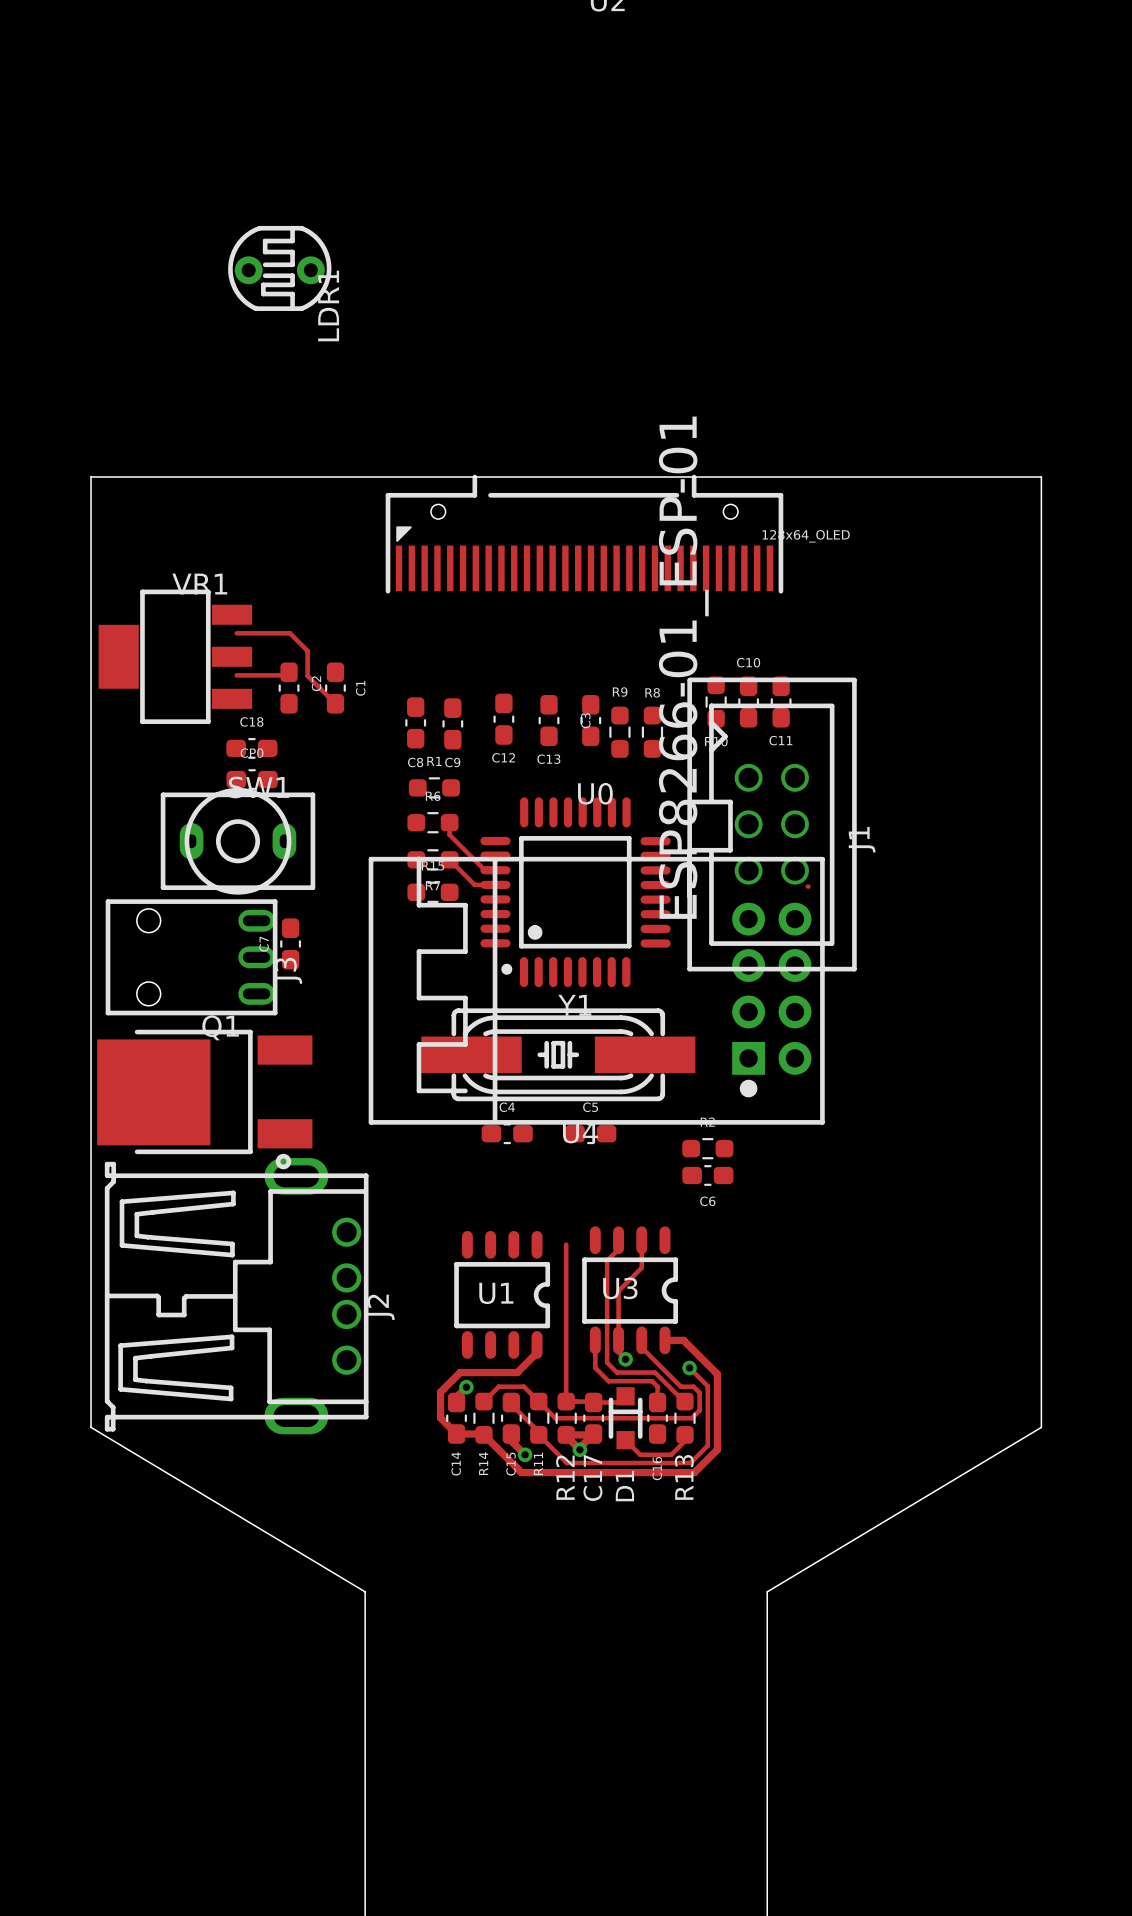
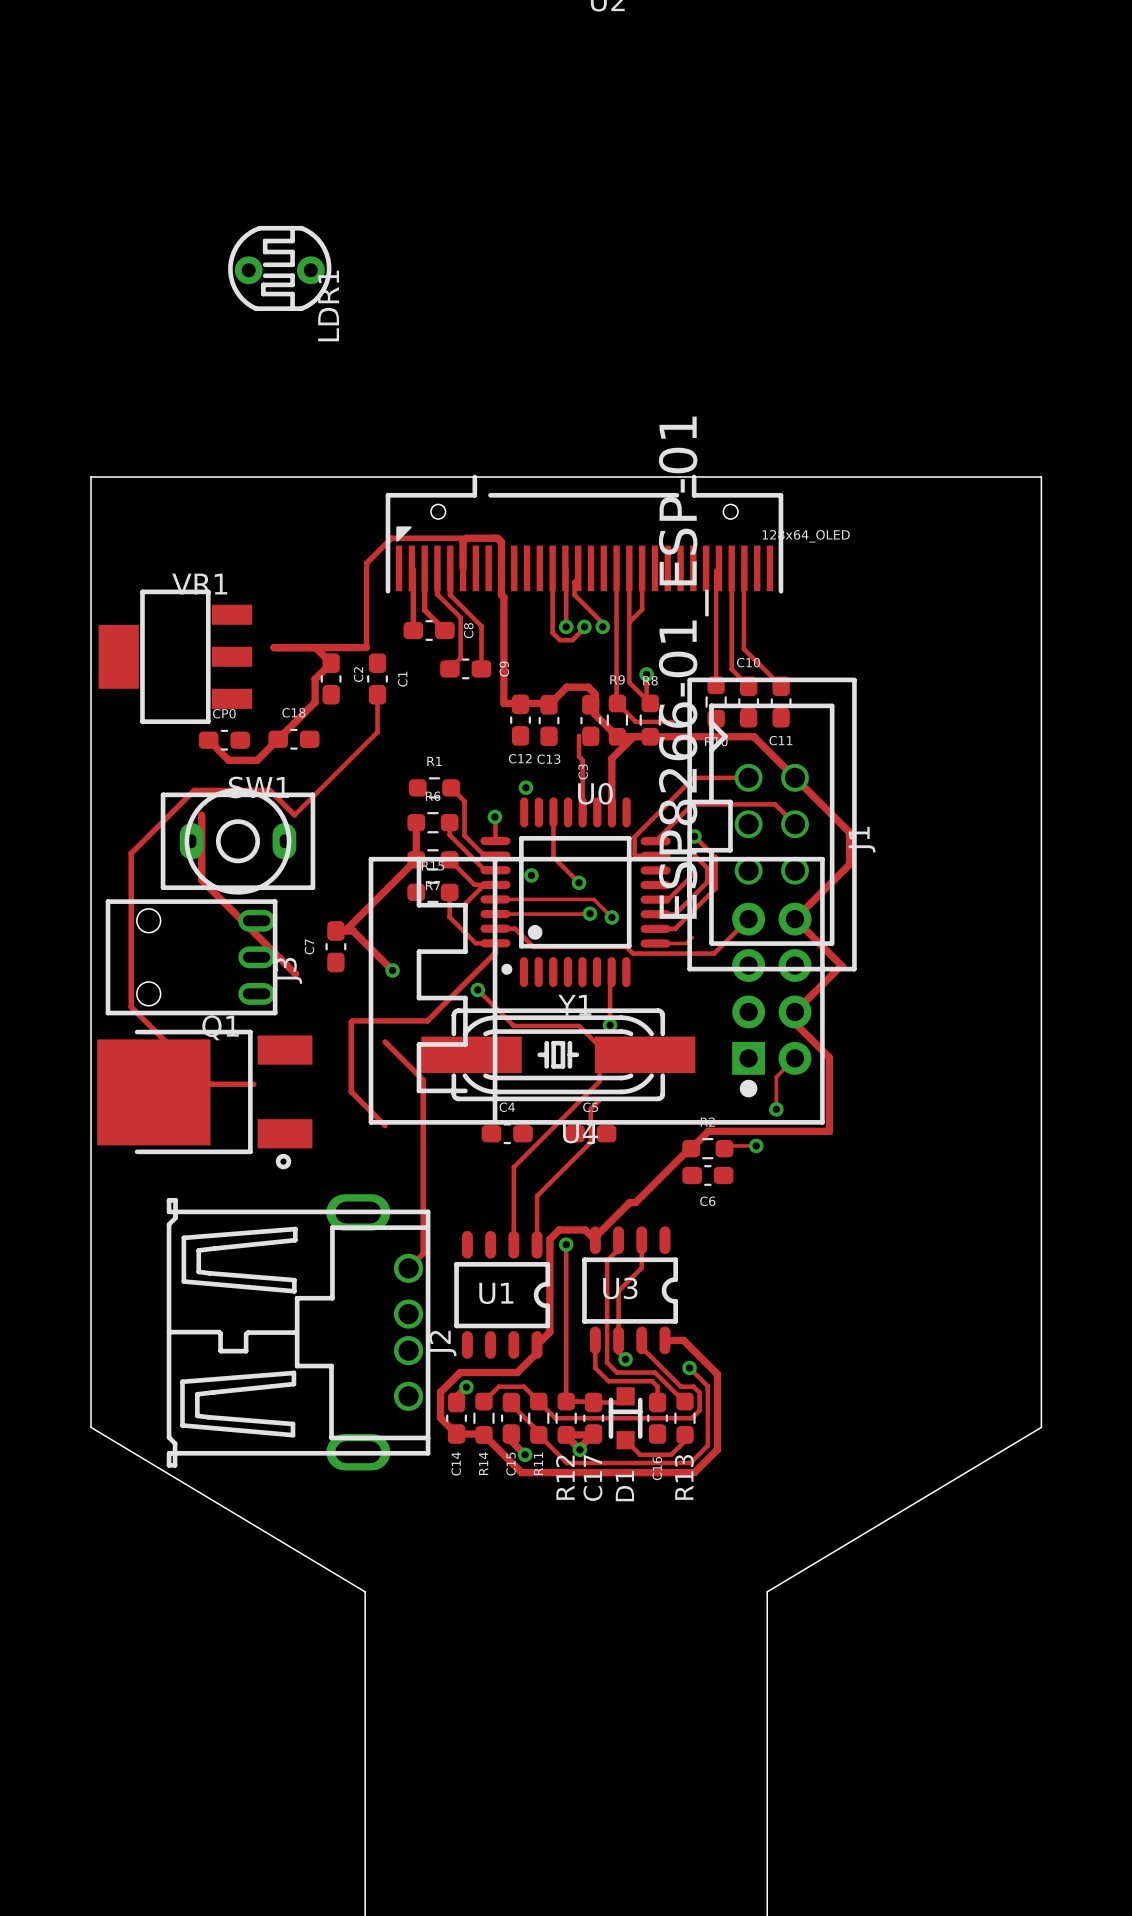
track: none -> (494, 538) (391, 538) (366, 563) (366, 647) (274, 647)
track: none -> (411, 568) (413, 630)
track: none -> (424, 568) (424, 610) (444, 630)
track: none -> (437, 568) (437, 594) (460, 617) (460, 658) (449, 668)
track: none -> (450, 568) (450, 595) (481, 626) (481, 668)
track: none -> (463, 568) (463, 541) (466, 538) (497, 538) (501, 541) (501, 594) (503, 597) (503, 703) (549, 704)
track: none -> (552, 568) (552, 632) (559, 640) (572, 640) (584, 626)
track: none -> (565, 568) (566, 626)
track: none -> (578, 568) (578, 578) (574, 581) (574, 595) (602, 623) (602, 626)
track: none -> (616, 568) (616, 702) (635, 721) (672, 721)
track: none -> (629, 568) (629, 682) (650, 703)
track: none -> (642, 568) (642, 609) (629, 622)
track: none -> (718, 568) (716, 571) (716, 685)
track: none -> (731, 568) (731, 669) (748, 686)
track: none -> (744, 568) (743, 649) (781, 686)
via: none -> (566, 626)
via: none -> (584, 626)
via: none -> (602, 626)
track: (236, 633) (290, 633) (307, 650) (307, 675) (335, 703) -> none
track: none -> (315, 647) (331, 663) (315, 679) (315, 702) (257, 760) (228, 760) (208, 740)
track: (289, 672) (286, 675) (236, 675) -> none
track: none -> (646, 674) (646, 699)
via: none -> (646, 674)
C2 position: (289, 688) -> (331, 678)
C1 position: (335, 688) -> (377, 678)
track: none -> (377, 694) (377, 732) (294, 815) (269, 790) (194, 790) (131, 853) (131, 1007) (208, 1084) (253, 1084)
track: none -> (549, 704) (566, 687) (588, 687) (594, 694) (594, 714) (617, 736) (753, 736) (849, 832) (849, 864) (795, 919) (842, 966) (840, 966) (795, 1011) (795, 1023) (829, 1057) (829, 1131) (708, 1131) (635, 1202) (629, 1202) (595, 1236) (595, 1240) (585, 1230) (559, 1230) (549, 1239) (549, 1332) (537, 1344)
C12 position: (503, 719) -> (520, 720)
C3 name position: C3 (585, 720) -> C3 (583, 771)
C8 rotation: 0° (415, 722) -> 90° clockwise (429, 630)
C8 position: (415, 722) -> (429, 630)
C9 rotation: 0° (452, 723) -> 90° clockwise (465, 668)
C9 position: (452, 723) -> (465, 668)
R9 position: (619, 732) -> (617, 720)
R8 position: (652, 732) -> (650, 720)
track: none -> (578, 735) (578, 756) (582, 760) (582, 812)
track: none -> (633, 736) (611, 758) (611, 812)
C18 position: (251, 748) -> (293, 739)
C8 name position: C8 (415, 762) -> C8 (468, 630)
C9 name position: C9 (452, 762) -> C9 (504, 669)
track: none -> (748, 777) (693, 777) (634, 837) (635, 855) (655, 855)
CP0 position: (252, 779) -> (224, 740)
track: none -> (451, 787) (464, 801) (464, 835) (484, 855) (495, 855)
via: none -> (525, 787)
track: none -> (553, 812) (553, 857) (578, 882)
track: none -> (201, 815) (201, 880) (295, 974)
track: none -> (494, 816) (495, 841)
via: none -> (494, 816)
track: none -> (416, 822) (416, 859) (345, 930)
track: none -> (795, 824) (775, 804) (692, 804) (655, 841)
track: none -> (694, 836) (715, 857) (715, 888) (675, 928) (655, 928)
via: none -> (694, 836)
track: none -> (694, 855) (707, 868) (707, 882) (675, 914) (655, 914)
track: none -> (694, 873) (668, 899) (655, 899)
via: none -> (531, 875)
via: none -> (578, 882)
track: none -> (484, 884) (465, 903) (465, 913)
track: (807, 886) (808, 886) -> none
track: none -> (449, 892) (449, 917) (475, 943) (495, 943) (495, 952) (427, 1020) (351, 1022) (351, 1091) (385, 1125)
track: none -> (495, 899) (593, 899) (611, 917)
track: none -> (590, 913) (495, 914)
via: none -> (590, 913)
via: none -> (611, 917)
track: none -> (748, 919) (714, 953) (632, 953) (626, 946) (533, 946) (515, 928) (495, 928)
track: none -> (335, 930) (353, 930) (392, 970)
track: none -> (692, 937) (686, 943) (655, 943)
C7 position: (290, 943) -> (335, 946)
via: none -> (392, 970)
track: none -> (611, 972) (610, 973) (610, 1025)
track: none -> (477, 989) (513, 1025) (579, 1025) (599, 1046) (599, 1081) (513, 1167) (513, 1244)
via: none -> (477, 989)
via: none -> (610, 1025)
track: none -> (385, 1041) (423, 1080) (423, 1253) (408, 1268)
track: none -> (795, 1058) (776, 1077) (776, 1109)
track: none -> (599, 1100) (590, 1109) (590, 1142) (537, 1196) (537, 1244)
via: none -> (776, 1109)
track: none -> (756, 1145) (727, 1145) (724, 1148)
via: none -> (756, 1145)
via: none -> (566, 1244)
J2 position: (236, 1296) -> (298, 1332)

